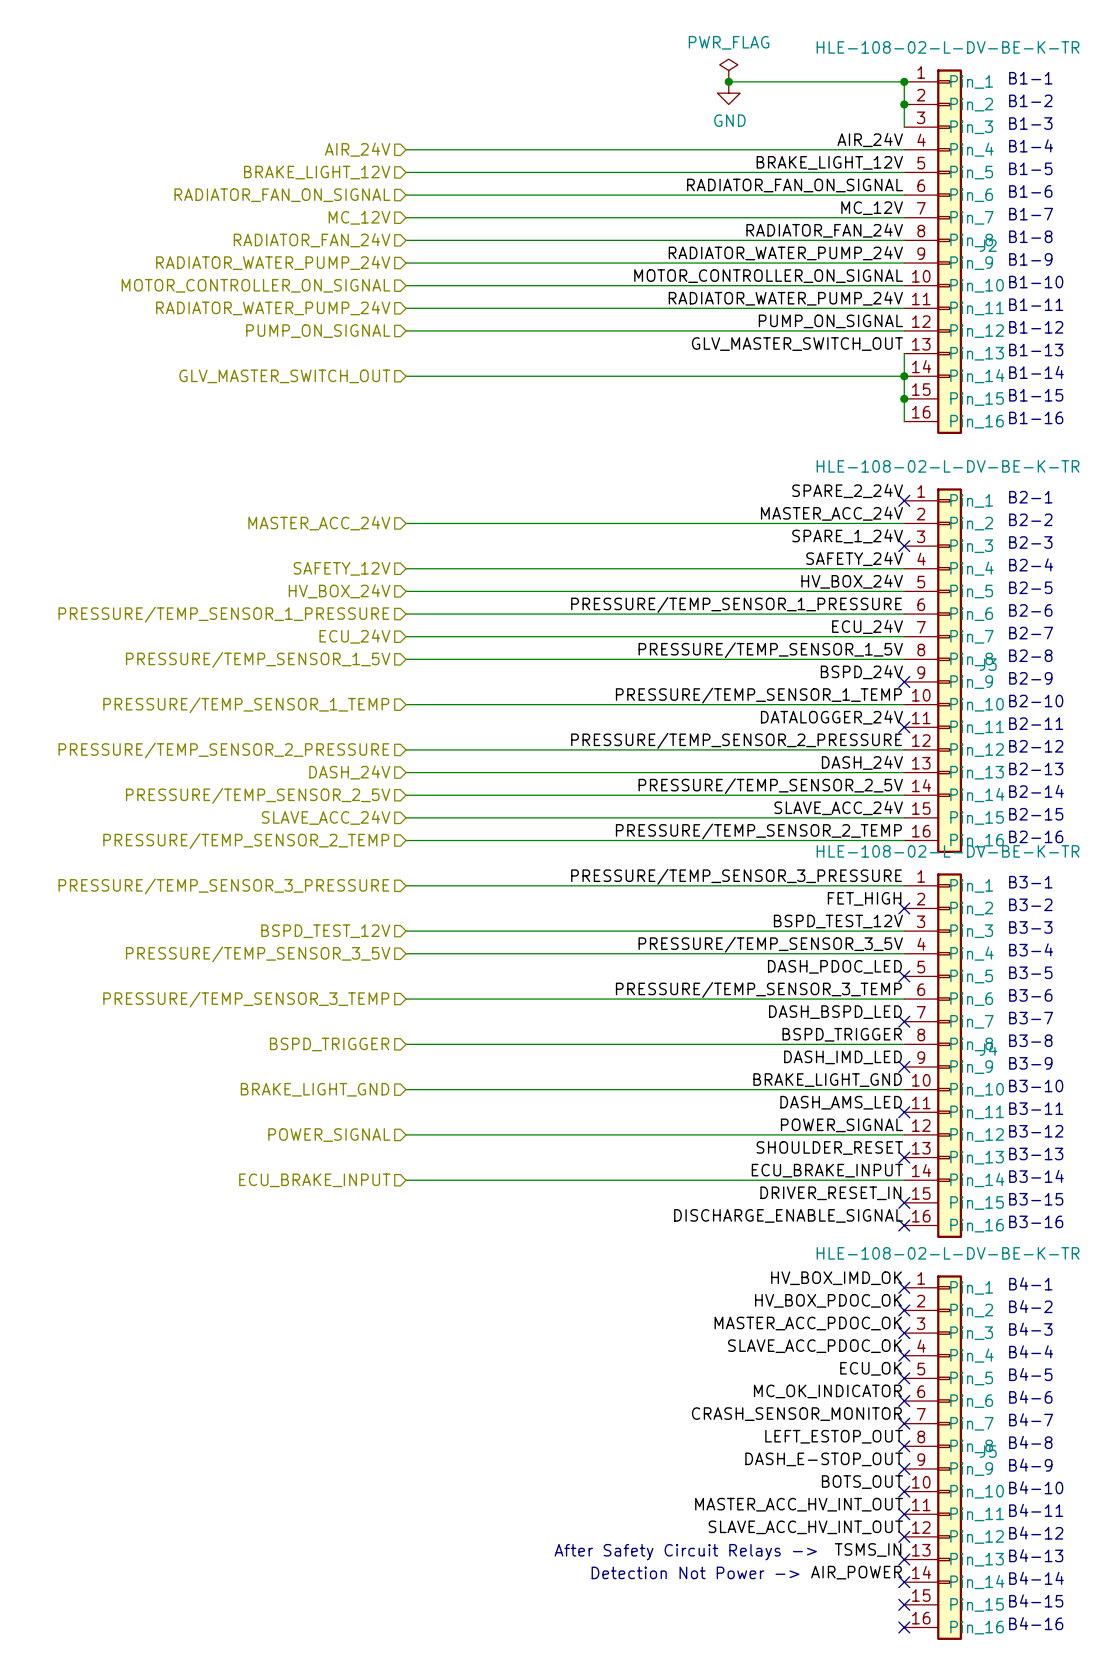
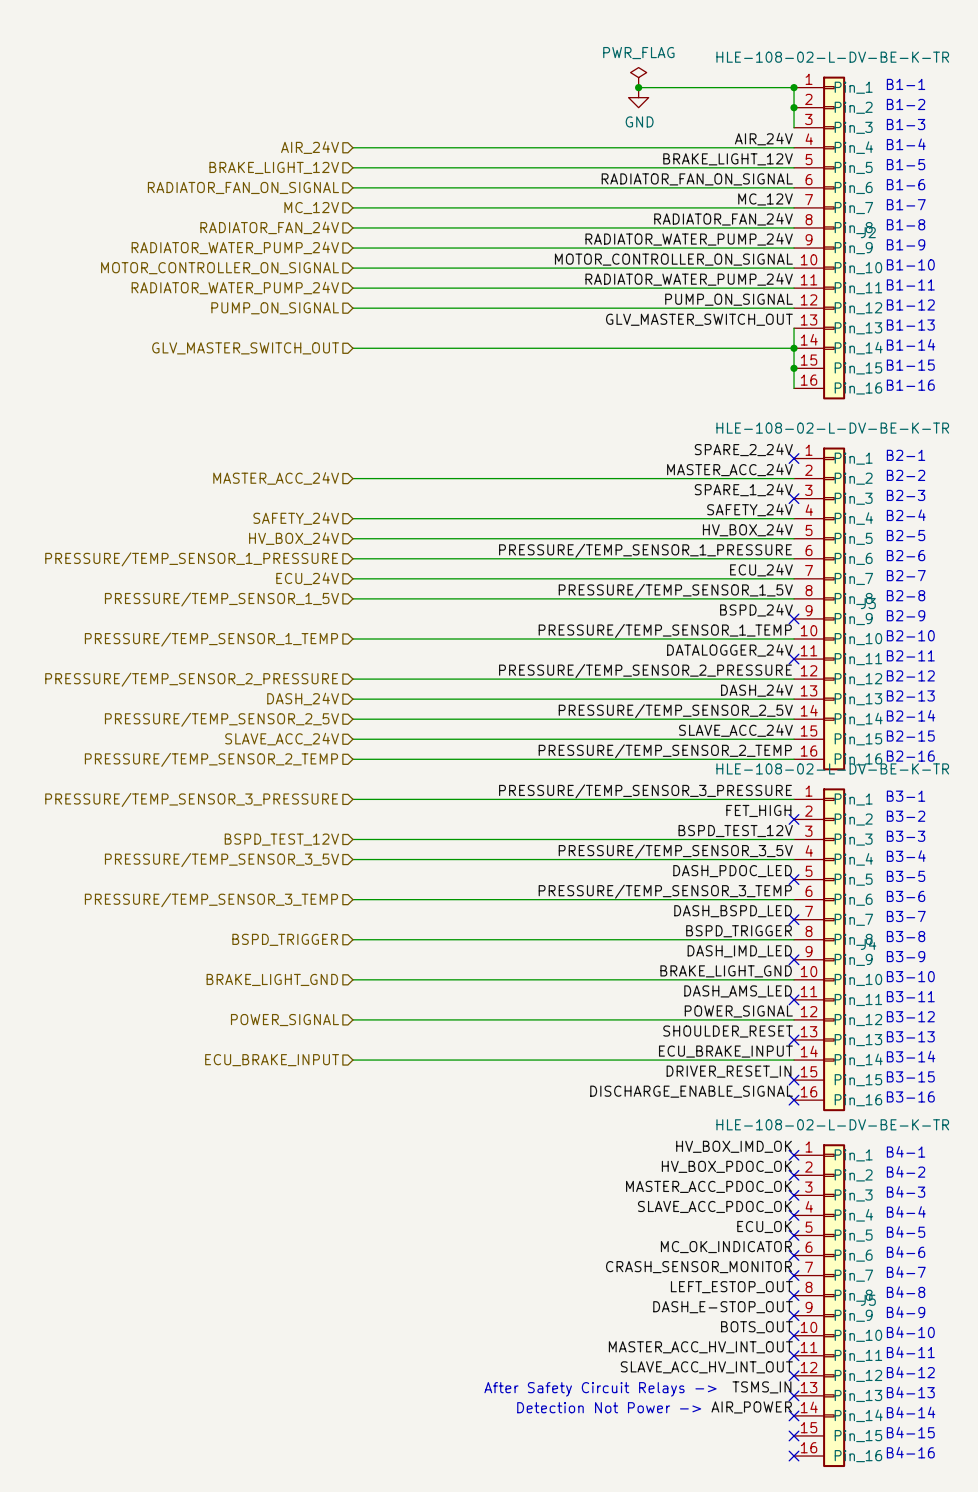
hierarchical label: SAFETY_12V (341, 568) -> SAFETY_24V (296, 518)

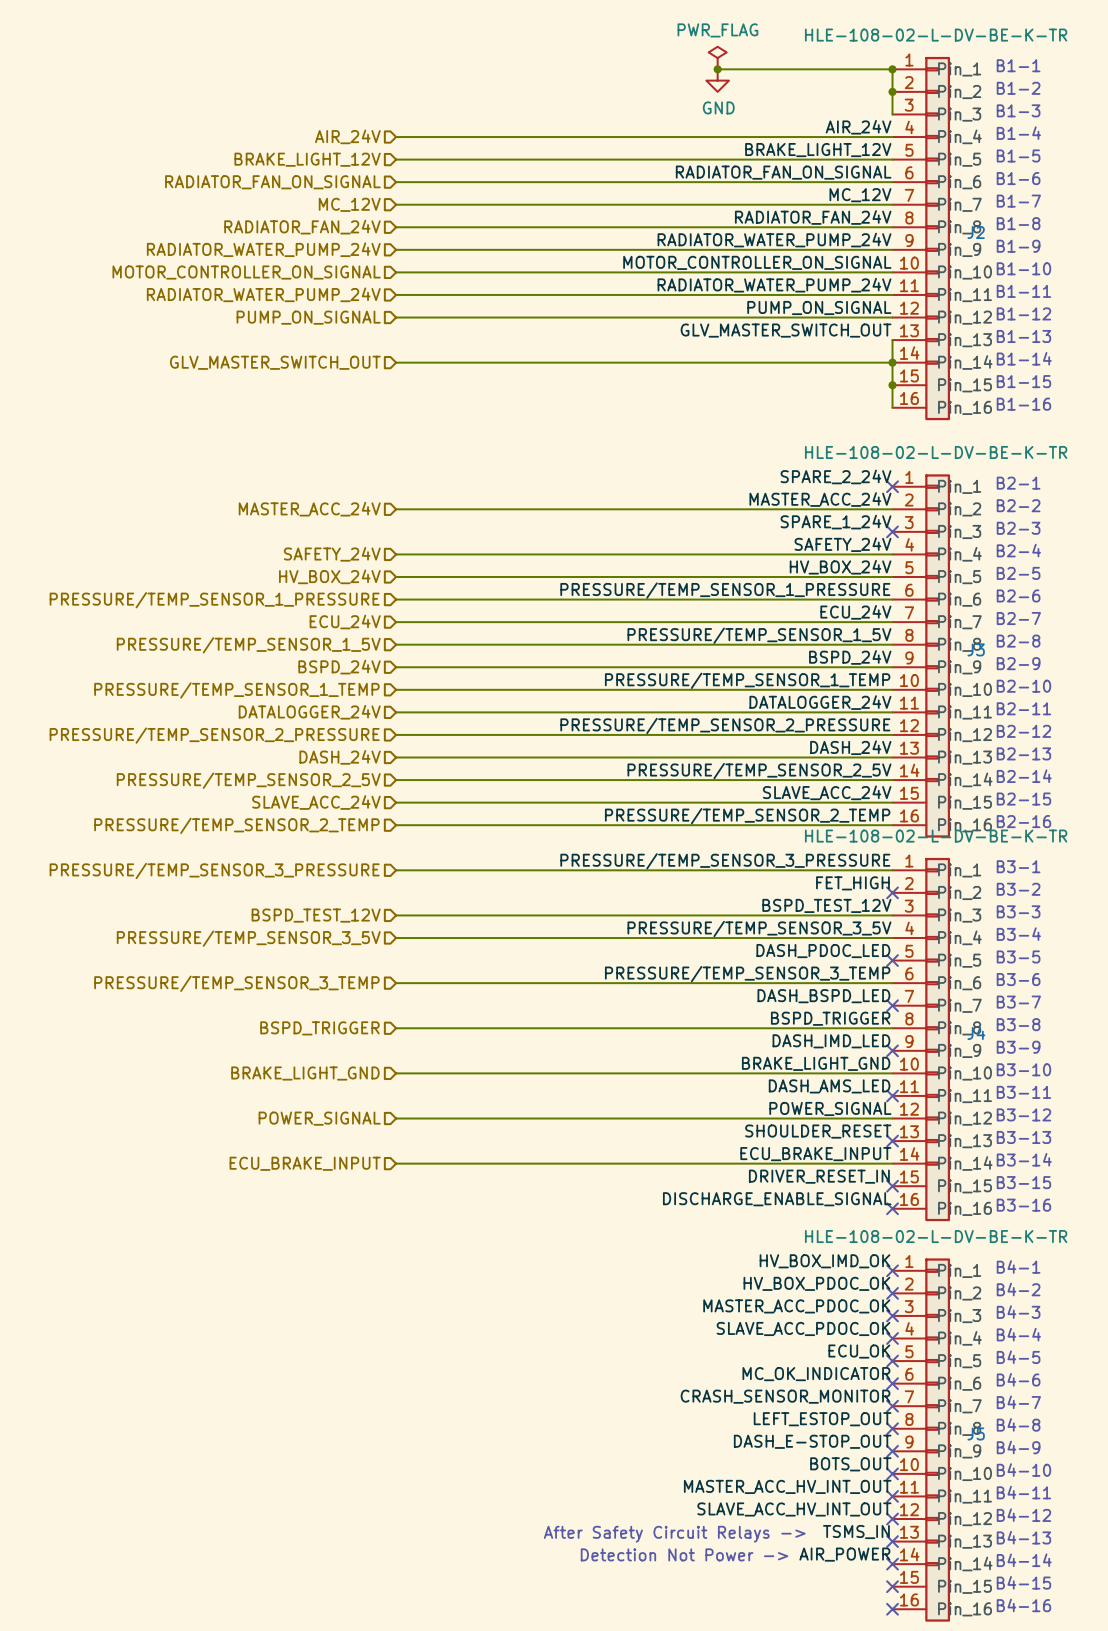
hierarchical label: none -> BSPD_24V (339, 667)
wire: none -> (396, 667) (892, 667)
no-connect mark: (794, 618) -> none
hierarchical label: none -> DATALOGGER_24V (309, 712)
wire: none -> (396, 712) (892, 712)
no-connect mark: (794, 659) -> none

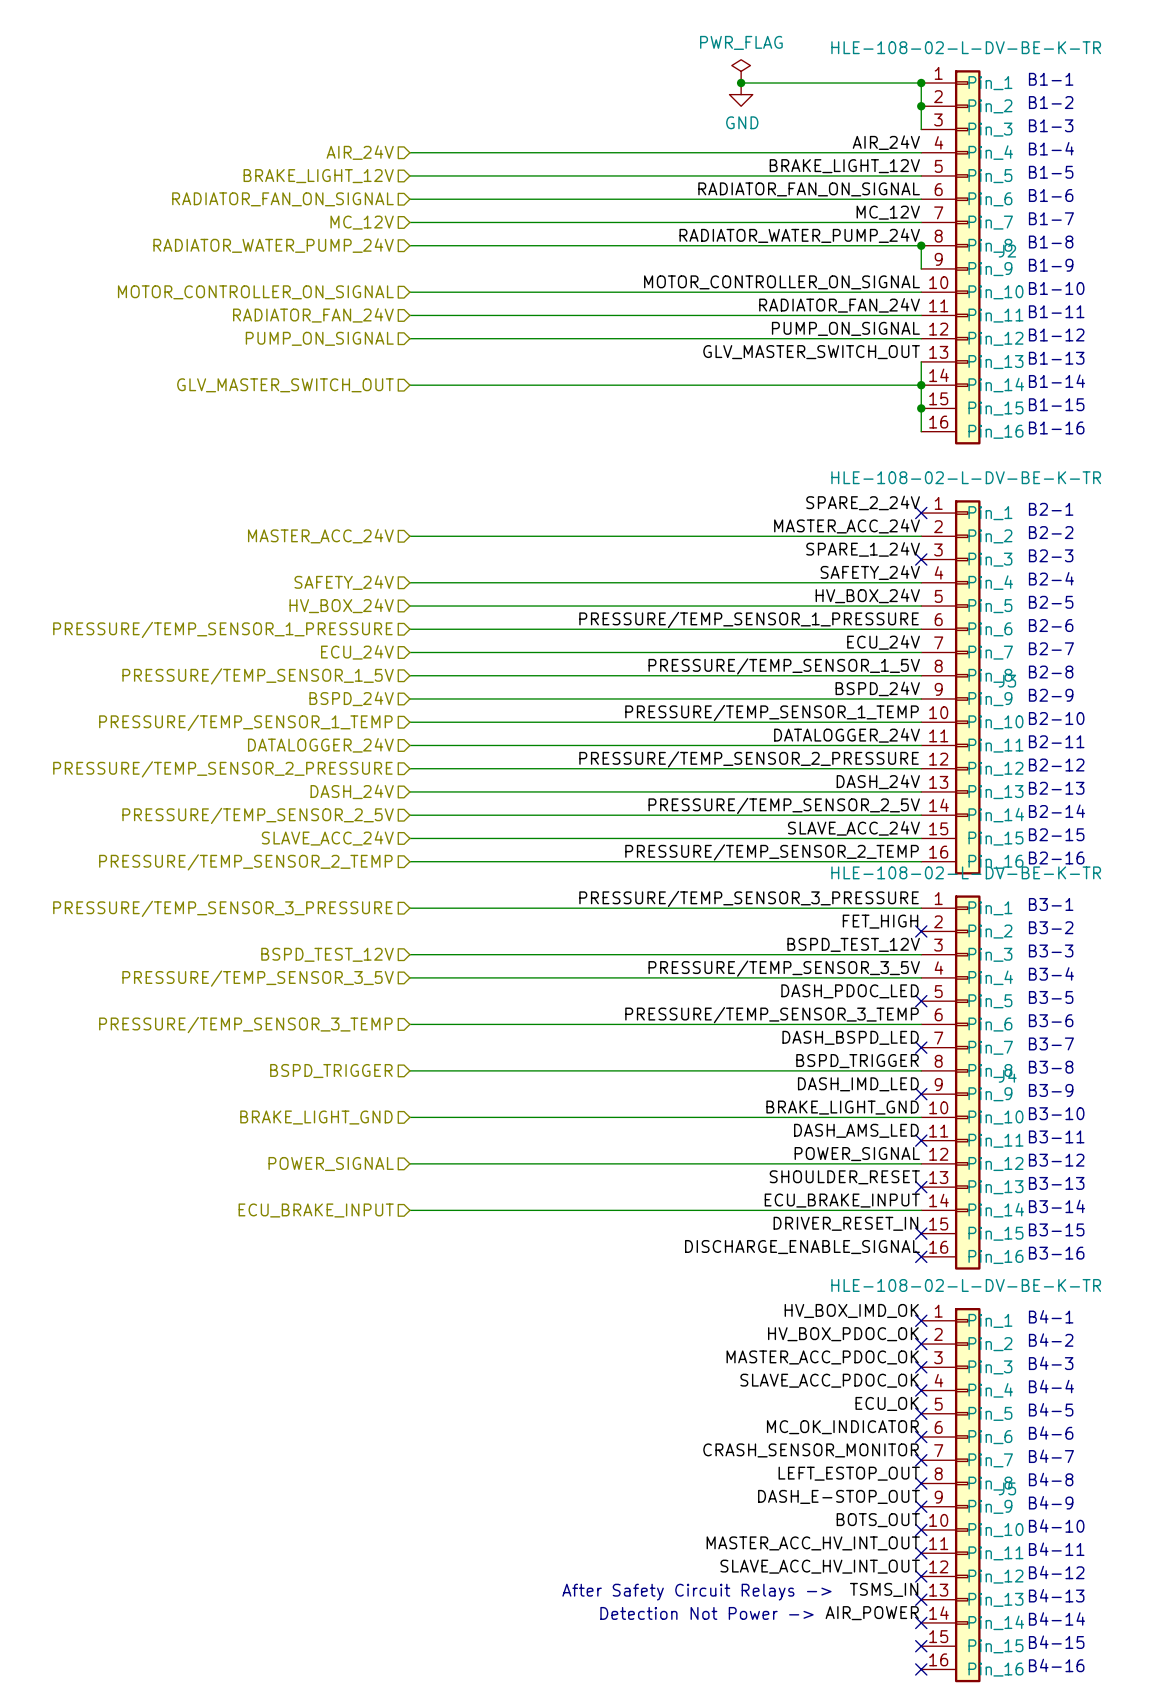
label: RADIATOR_FAN_24V (813, 217) -> RADIATOR_WATER_PUMP_24V (799, 235)
hierarchical label: RADIATOR_FAN_24V (302, 227) -> RADIATOR_WATER_PUMP_24V (273, 245)
junction: none -> (921, 245)
label: RADIATOR_WATER_PUMP_24V (774, 240) -> none
hierarchical label: RADIATOR_WATER_PUMP_24V (263, 249) -> none
wire: (396, 249) (892, 249) -> (921, 245) (921, 268)
label: RADIATOR_WATER_PUMP_24V (774, 285) -> RADIATOR_FAN_24V (839, 305)
hierarchical label: RADIATOR_WATER_PUMP_24V (263, 294) -> RADIATOR_FAN_24V (313, 315)

